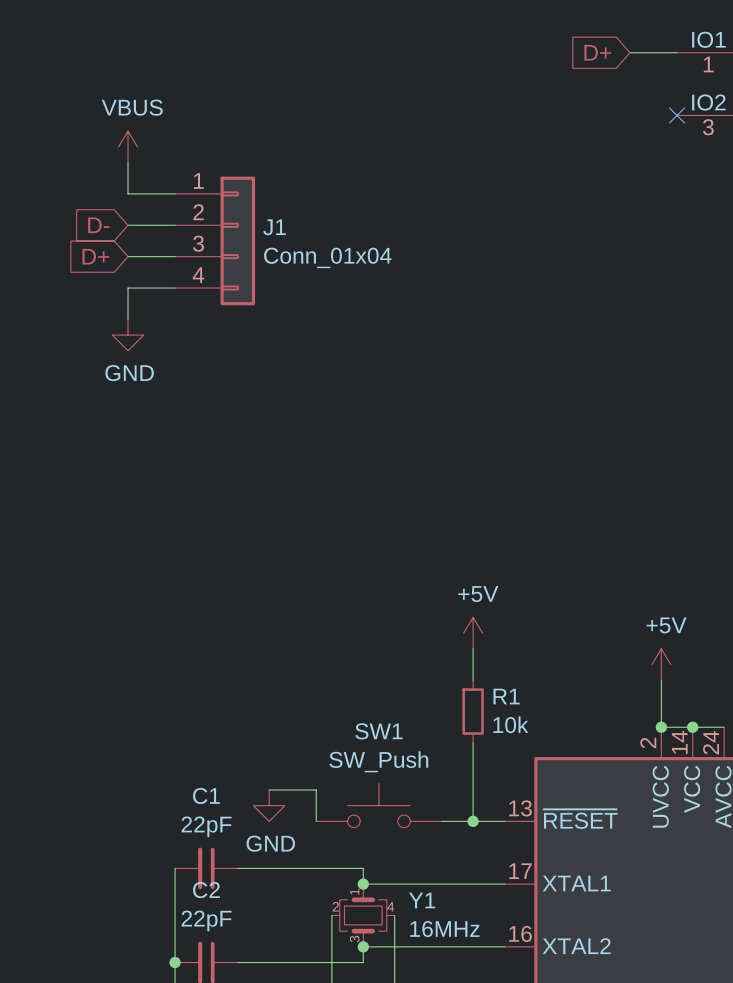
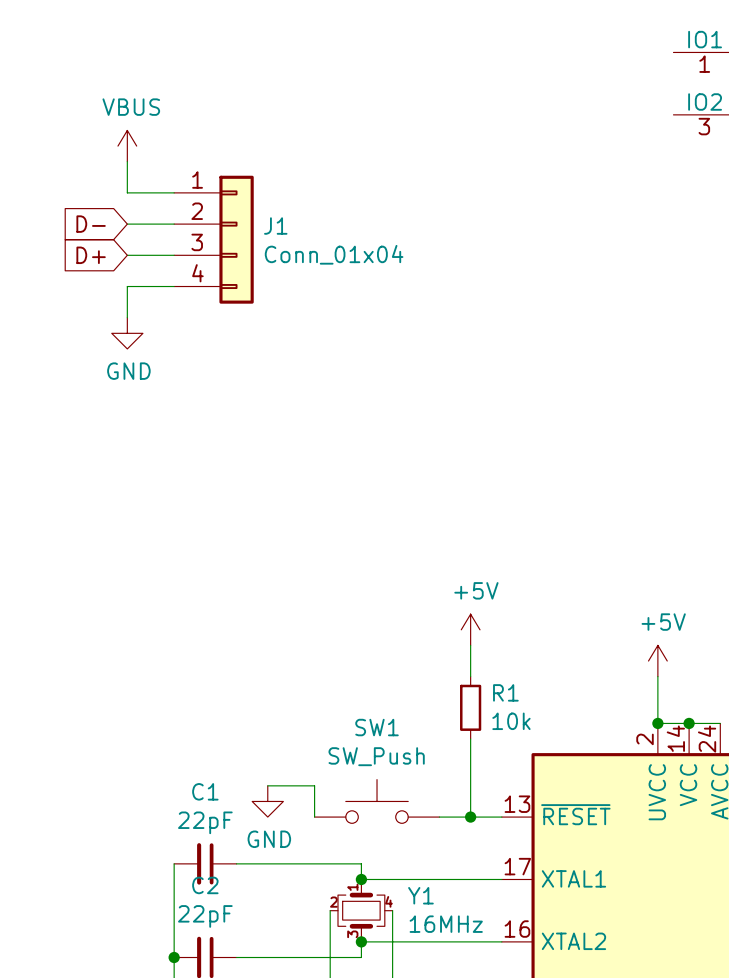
global label: D+ (597, 52) -> none
wire: (629, 52) (677, 52) -> none
no-connect mark: (677, 115) -> none

